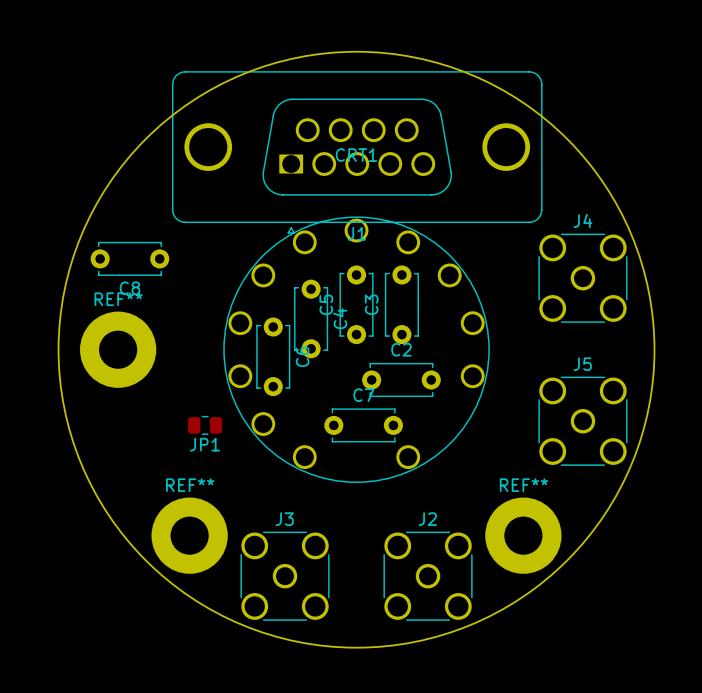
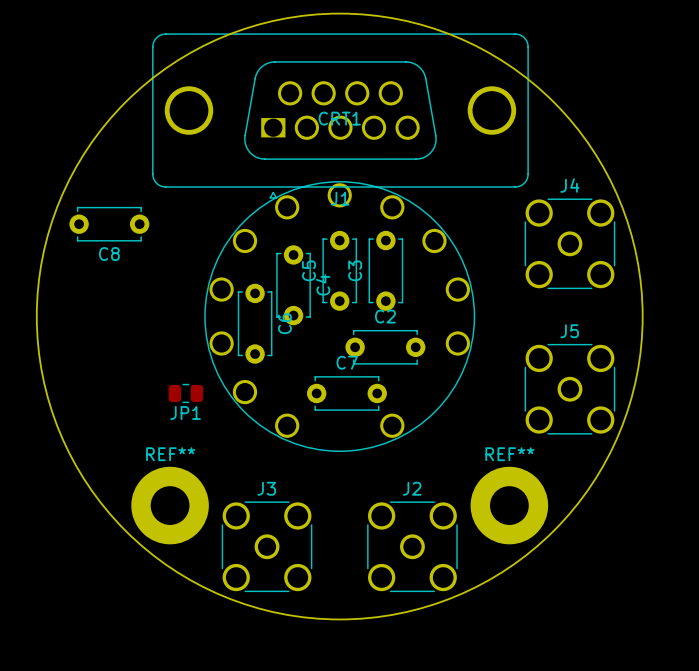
REF**: (118, 349) -> none

